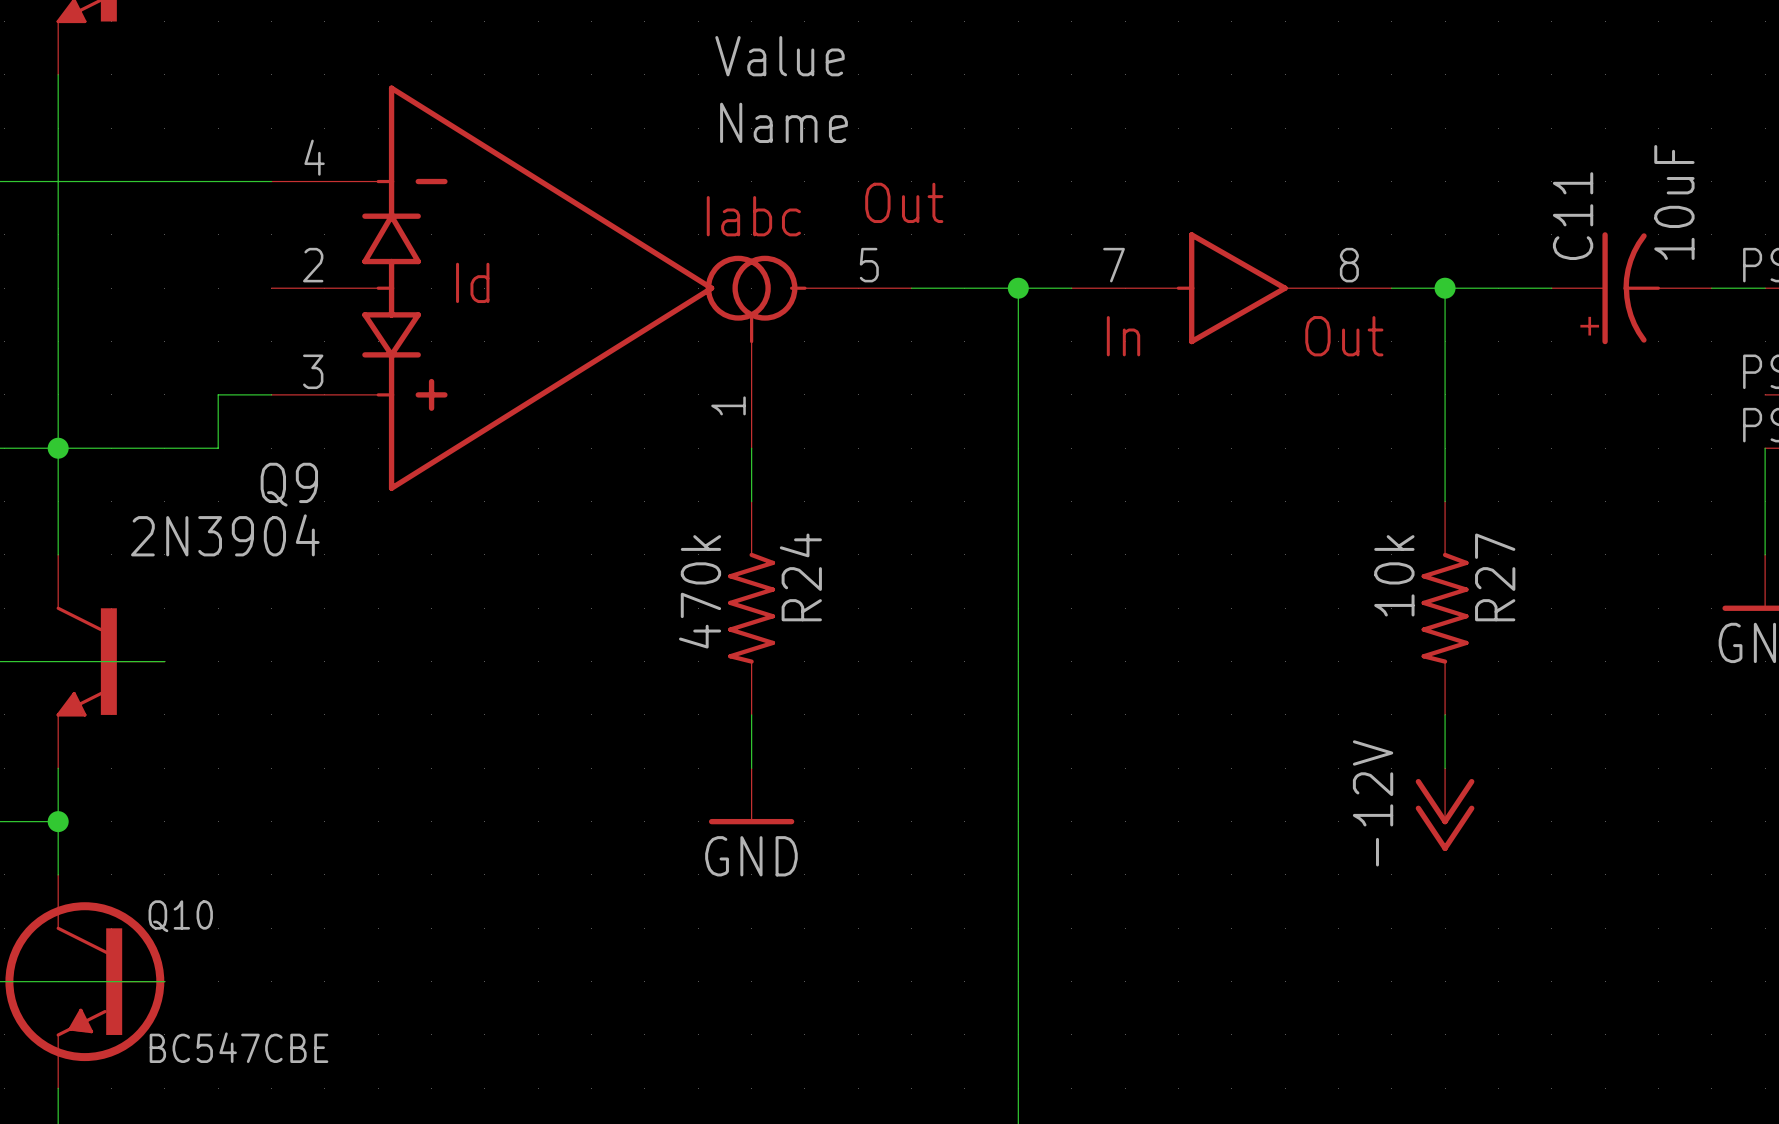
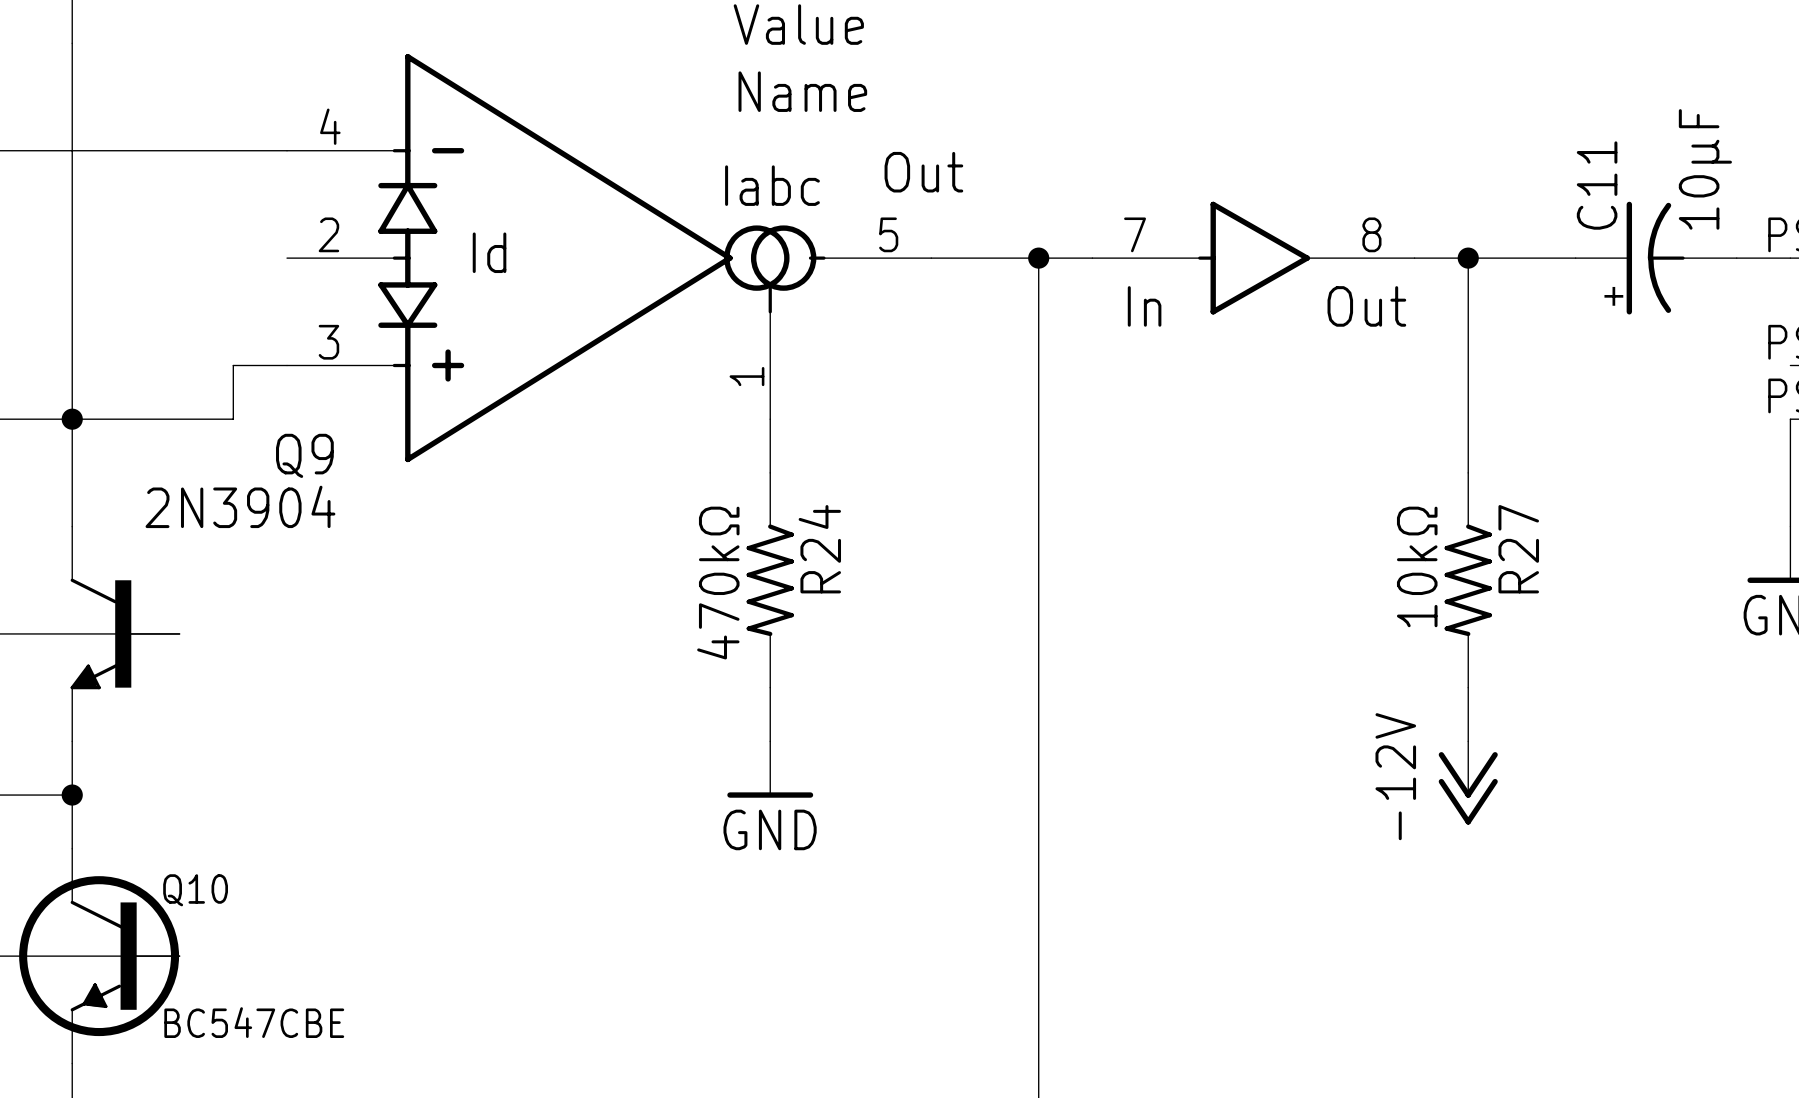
C11 value: 10uF (1674, 202) -> 10μF (1705, 169)
R27 value: 10k (1394, 575) -> 10kΩ (1417, 566)
R24 value: 470k (700, 591) -> 470kΩ (718, 583)

